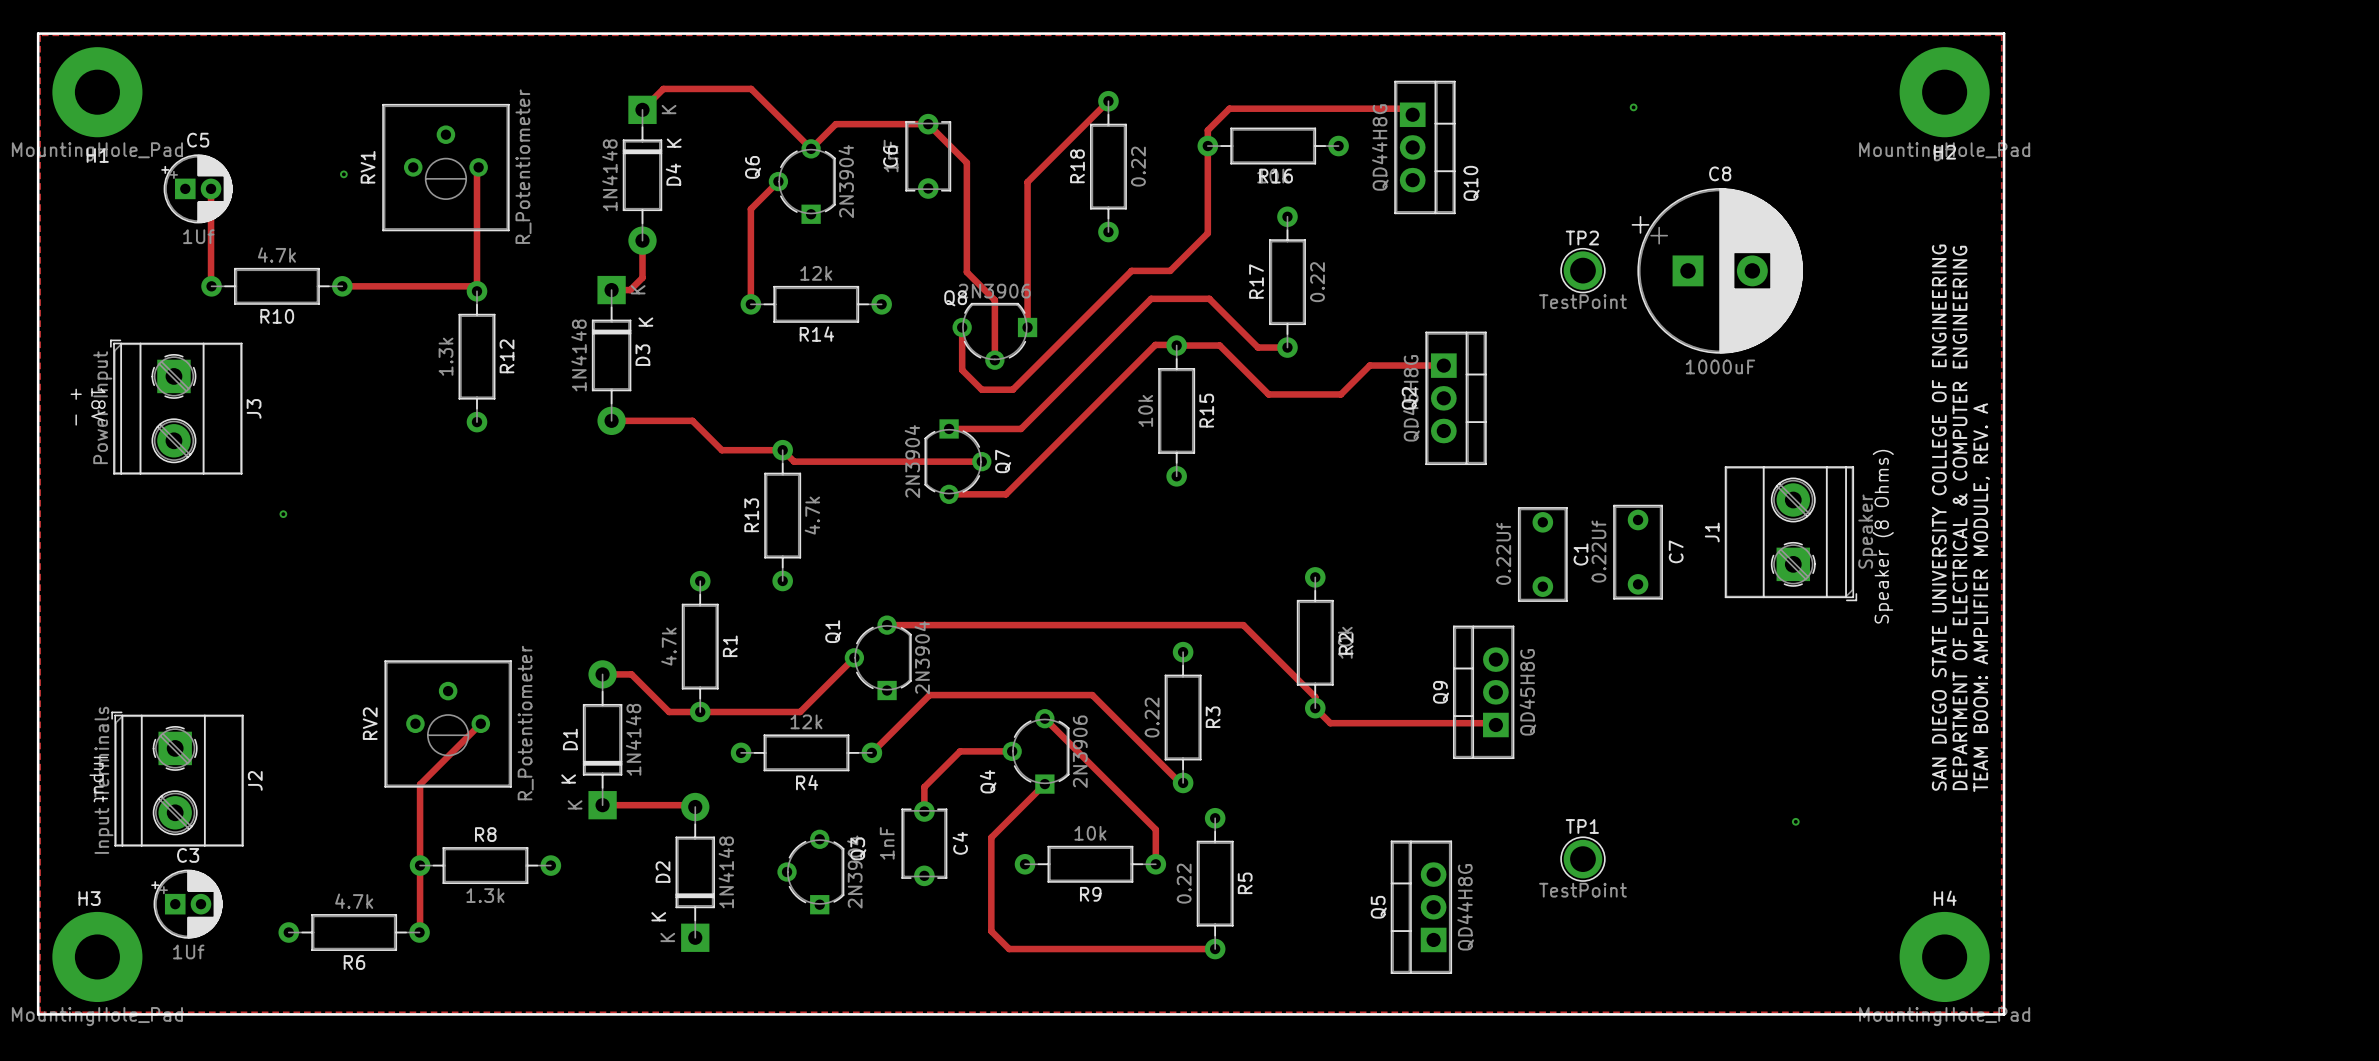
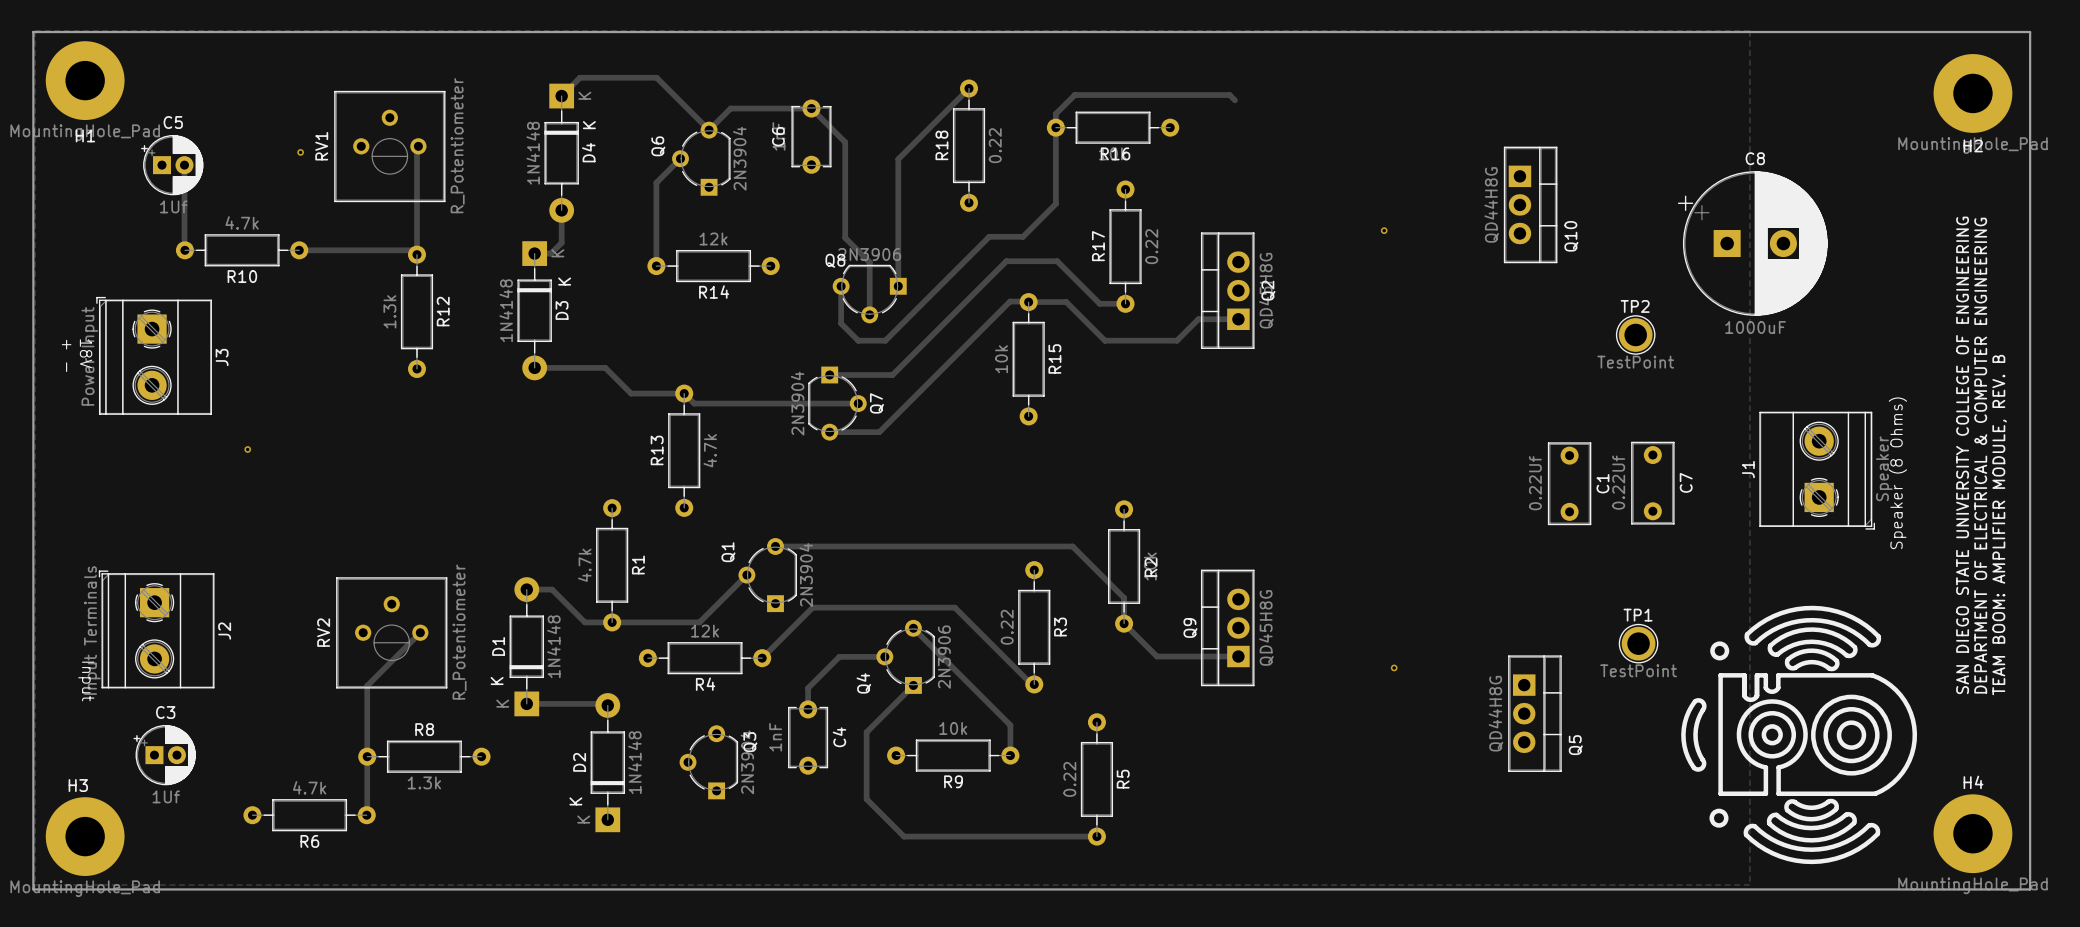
board edge: (38, 36) (38, 33) (2004, 33) (2004, 1014) (38, 1014) -> (33, 32) (2030, 32) (2030, 889) (33, 889) (33, 886)
H2 position: (1944, 92) -> (1972, 93)
via: (1633, 107) -> none
Q10 position: (1424, 147) -> (1530, 204)
via: none -> (1384, 230)
TP2 position: (1582, 270) -> (1635, 334)
C8 position: (1717, 270) -> (1752, 243)
track: (1443, 365) (1369, 365) (1340, 394) (1268, 394) (1263, 389) -> (1238, 319) (1198, 319) (1176, 340) (1104, 340)
Q2 rotation: 0° (1456, 398) -> 180° (1227, 290)
Q2 position: (1456, 398) -> (1227, 290)
text position: SAN DIEGO STATE UNIVERSITY COLLEGE OF ENGINEERING (1939, 517) -> SAN DIEGO STATE UNIVERSITY COLLEGE OF ENGINEERING (1962, 455)
text position: DEPARTMENT OF ELECTRICAL & COMPUTER ENGINEERING (1960, 517) -> DEPARTMENT OF ELECTRICAL & COMPUTER ENGINEERING (1980, 455)
J1 position: (1790, 533) -> (1817, 470)
text position: Speaker (8 Ohms) (1883, 536) -> Speaker (8 Ohms) (1897, 473)
C7 position: (1638, 552) -> (1652, 483)
C1 position: (1542, 554) -> (1569, 483)
text: TEAM BOOM: AMPLIFIER MODULE, REV. A (1981, 597) -> none
text: none -> TEAM BOOM: AMPLIFIER MODULE, REV. B (1999, 525)
track: (1226, 625) (1243, 625) (1315, 697) (1315, 708) (1330, 723) (1494, 723) (1495, 725) -> (1072, 546) (1124, 597) (1124, 623) (1156, 656) (1238, 656)
R2 position: (1315, 642) -> (1124, 566)
Q9 position: (1483, 692) -> (1227, 627)
line: none -> (1747, 634) (1748, 640) (1754, 643) (1772, 630) (1785, 624) (1813, 620) (1840, 625) (1853, 631) (1870, 645) (1876, 643) (1878, 638) (1872, 630) (1852, 617) (1829, 609) (1813, 608) (1797, 609) (1773, 616) (1747, 634)
drawing: none -> [1710, 641, 1730, 661]
line: none -> (1770, 645) (1770, 651) (1776, 654) (1793, 645) (1805, 642) (1824, 643) (1848, 655) (1853, 654) (1855, 650) (1849, 642) (1838, 635) (1812, 629) (1786, 634) (1770, 645)
line: none -> (1787, 659) (1787, 665) (1792, 668) (1812, 662) (1832, 669) (1837, 663) (1829, 655) (1812, 650) (1799, 652) (1787, 659)
via: none -> (1394, 667)
line: none -> (1720, 675) (1744, 675) (1744, 695) (1750, 699) (1756, 695) (1756, 675) (1765, 675) (1765, 687) (1772, 691) (1778, 687) (1778, 675) (1872, 675) (1878, 678) (1890, 685) (1900, 695) (1910, 713) (1914, 733) (1913, 747) (1909, 760) (1898, 777) (1887, 787) (1875, 793) (1778, 793) (1778, 767) (1790, 762) (1799, 753) (1804, 742) (1805, 729) (1800, 717) (1792, 708) (1780, 702) (1767, 701) (1755, 705) (1746, 713) (1740, 725) (1738, 733) (1740, 746) (1747, 757) (1757, 764) (1765, 767) (1765, 793) (1720, 793) (1720, 675)
J2 position: (177, 779) -> (156, 629)
drawing: none -> [1811, 694, 1892, 776]
line: none -> (1695, 701) (1686, 716) (1683, 740) (1688, 757) (1693, 767) (1698, 769) (1702, 767) (1704, 763) (1696, 744) (1695, 729) (1704, 706) (1701, 700) (1695, 701)
drawing: none -> [1748, 711, 1797, 759]
via: (1795, 821) -> none
TP1 position: (1582, 859) -> (1638, 643)
R5 position: (1215, 883) -> (1096, 779)
C3 position: (186, 904) -> (164, 755)
Q5 name position: Q5 (1378, 907) -> Q5 (1575, 745)
Q5 rotation: 0° (1421, 907) -> 180° (1534, 713)
Q5 position: (1421, 907) -> (1534, 713)
track: (991, 914) (991, 931) (1009, 949) (1215, 949) -> (866, 799) (904, 836) (1096, 836)
line: none -> (1828, 801) (1820, 806) (1811, 807) (1791, 801) (1787, 803) (1786, 808) (1798, 817) (1816, 818) (1824, 816) (1836, 809) (1834, 802) (1828, 801)
drawing: none -> [1709, 808, 1729, 828]
line: none -> (1846, 814) (1852, 816) (1854, 823) (1837, 834) (1818, 839) (1792, 837) (1780, 831) (1769, 822) (1771, 816) (1776, 814) (1786, 822) (1798, 826) (1817, 827) (1829, 824) (1846, 814)
line: none -> (1868, 825) (1846, 841) (1819, 849) (1798, 848) (1784, 845) (1771, 839) (1754, 826) (1748, 827) (1745, 833) (1758, 845) (1780, 856) (1795, 860) (1820, 861) (1843, 856) (1865, 844) (1877, 833) (1875, 826) (1868, 825)
H4 position: (1944, 956) -> (1972, 833)

